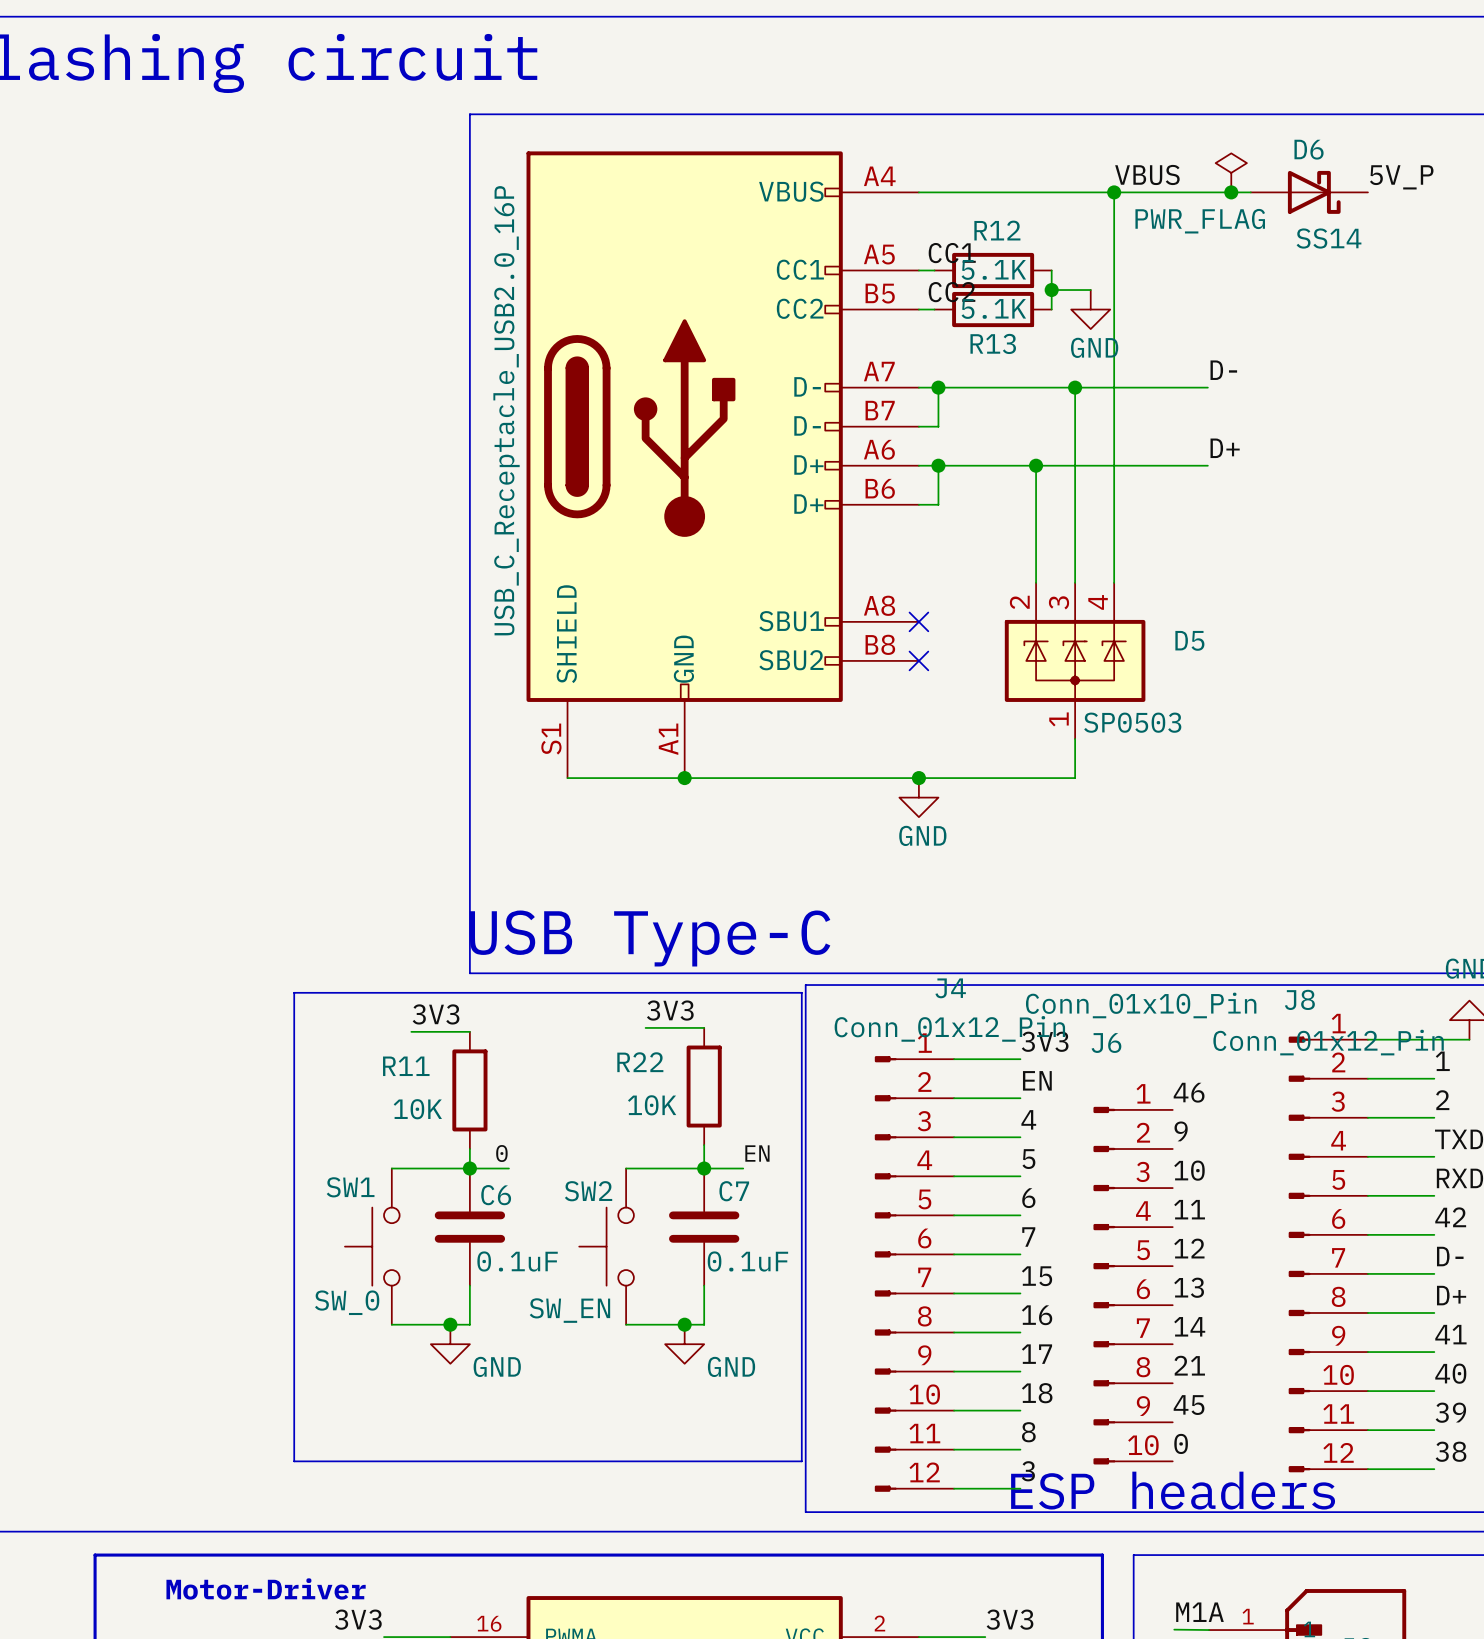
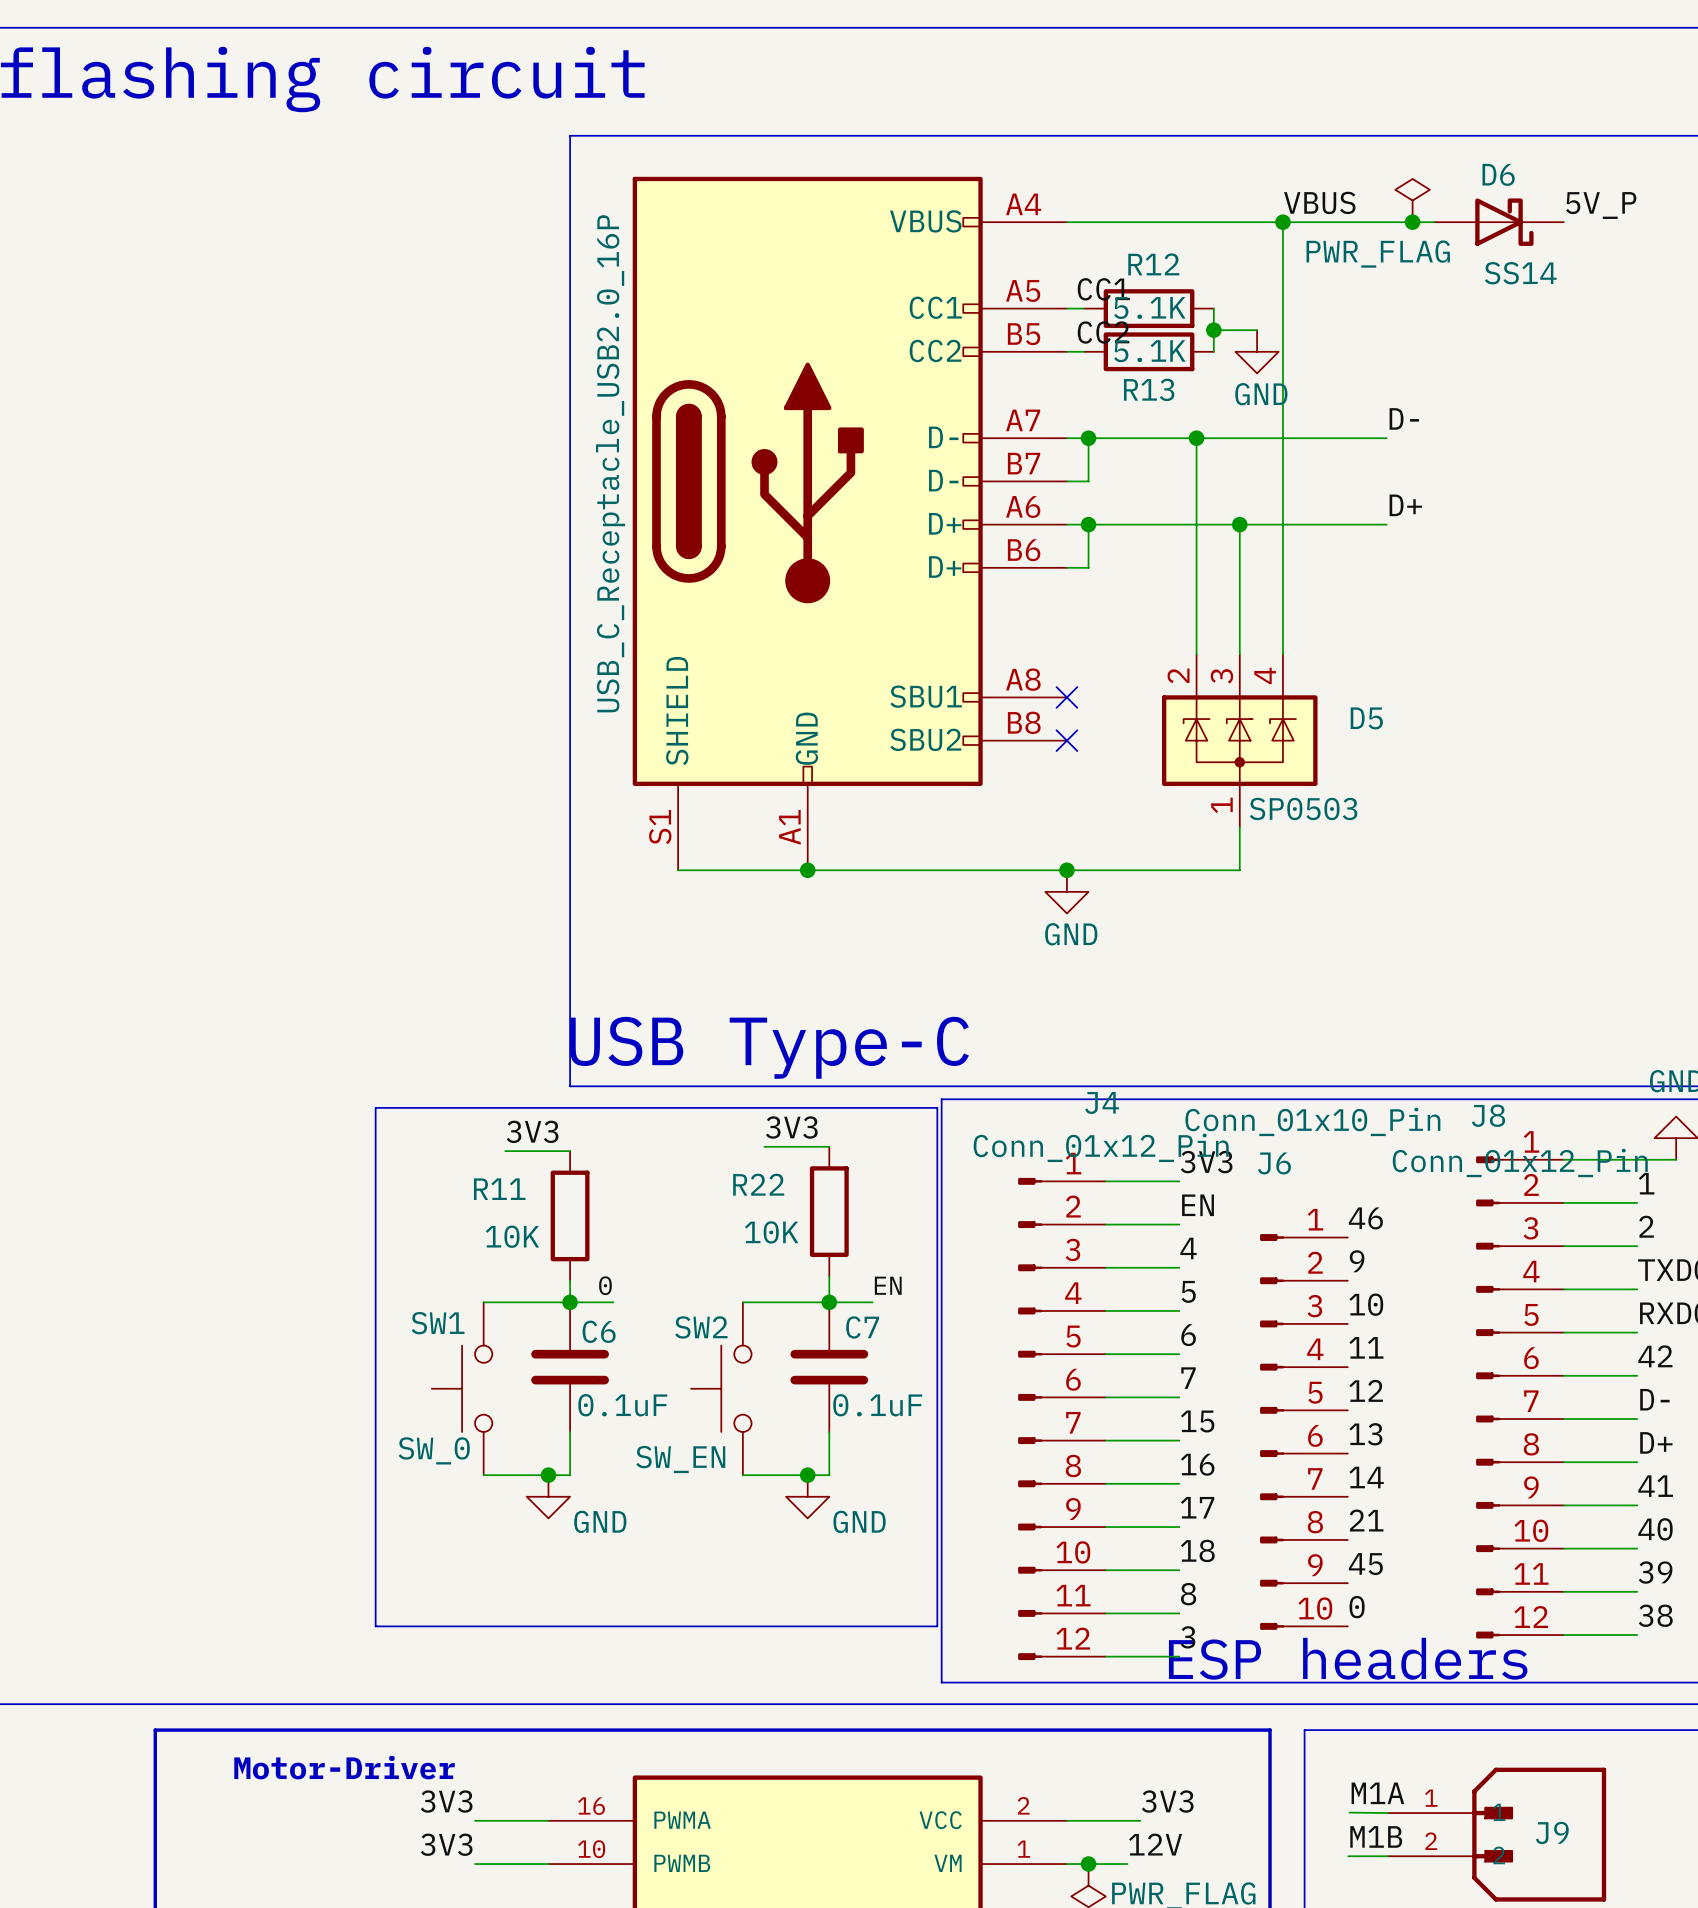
junction: none -> (1196, 438)
wire: (1075, 387) (1075, 465) -> (1196, 438) (1196, 524)
junction: (1075, 387) -> none
junction: (1036, 465) -> none
junction: none -> (1239, 524)

